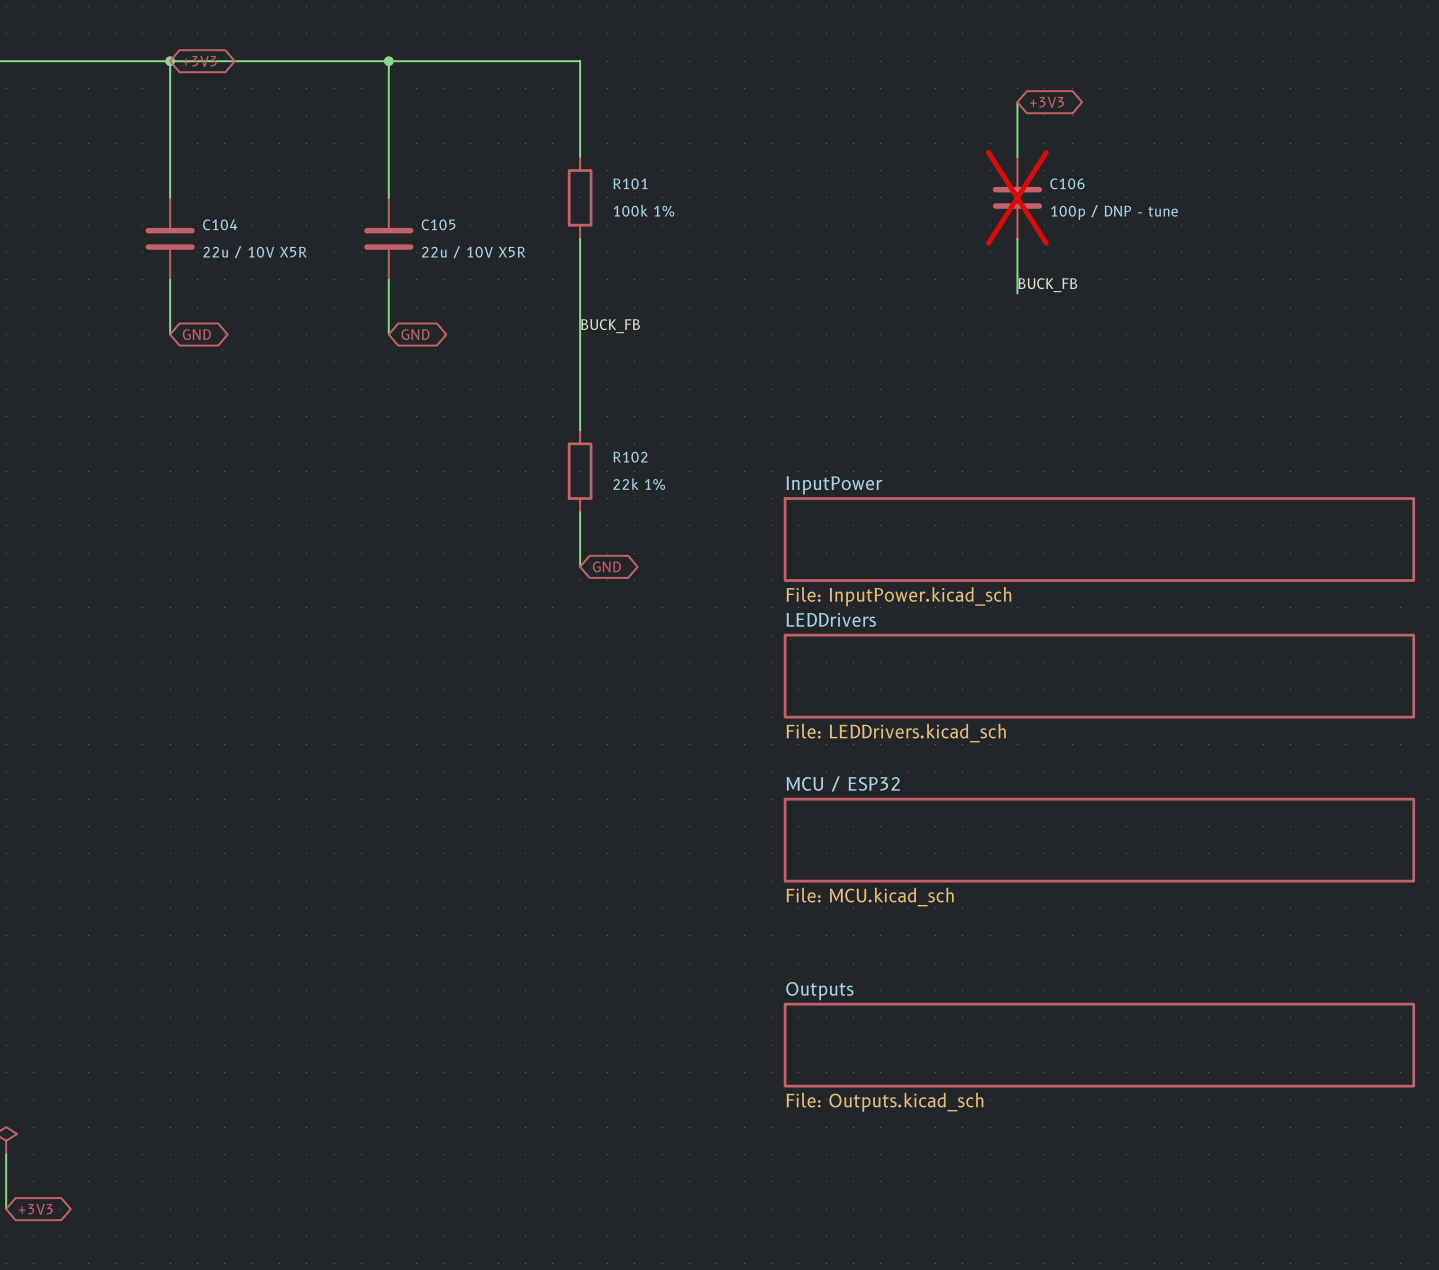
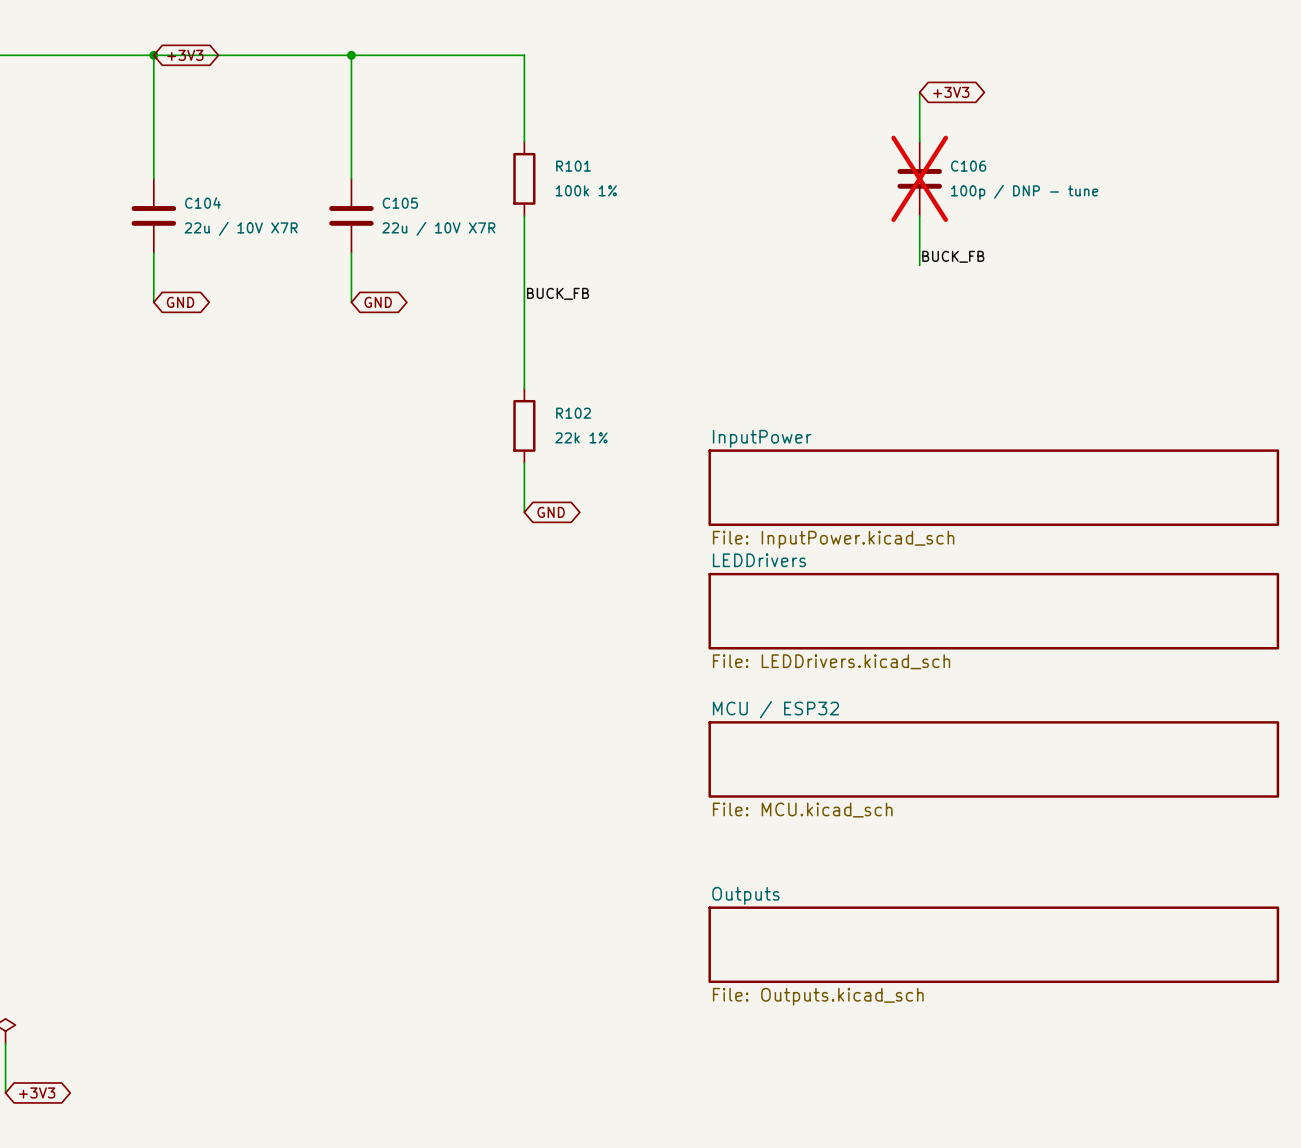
C104 value: 22u / 10V X5R (255, 252) -> 22u / 10V X7R (241, 228)
C105 value: 22u / 10V X5R (473, 252) -> 22u / 10V X7R (438, 228)

